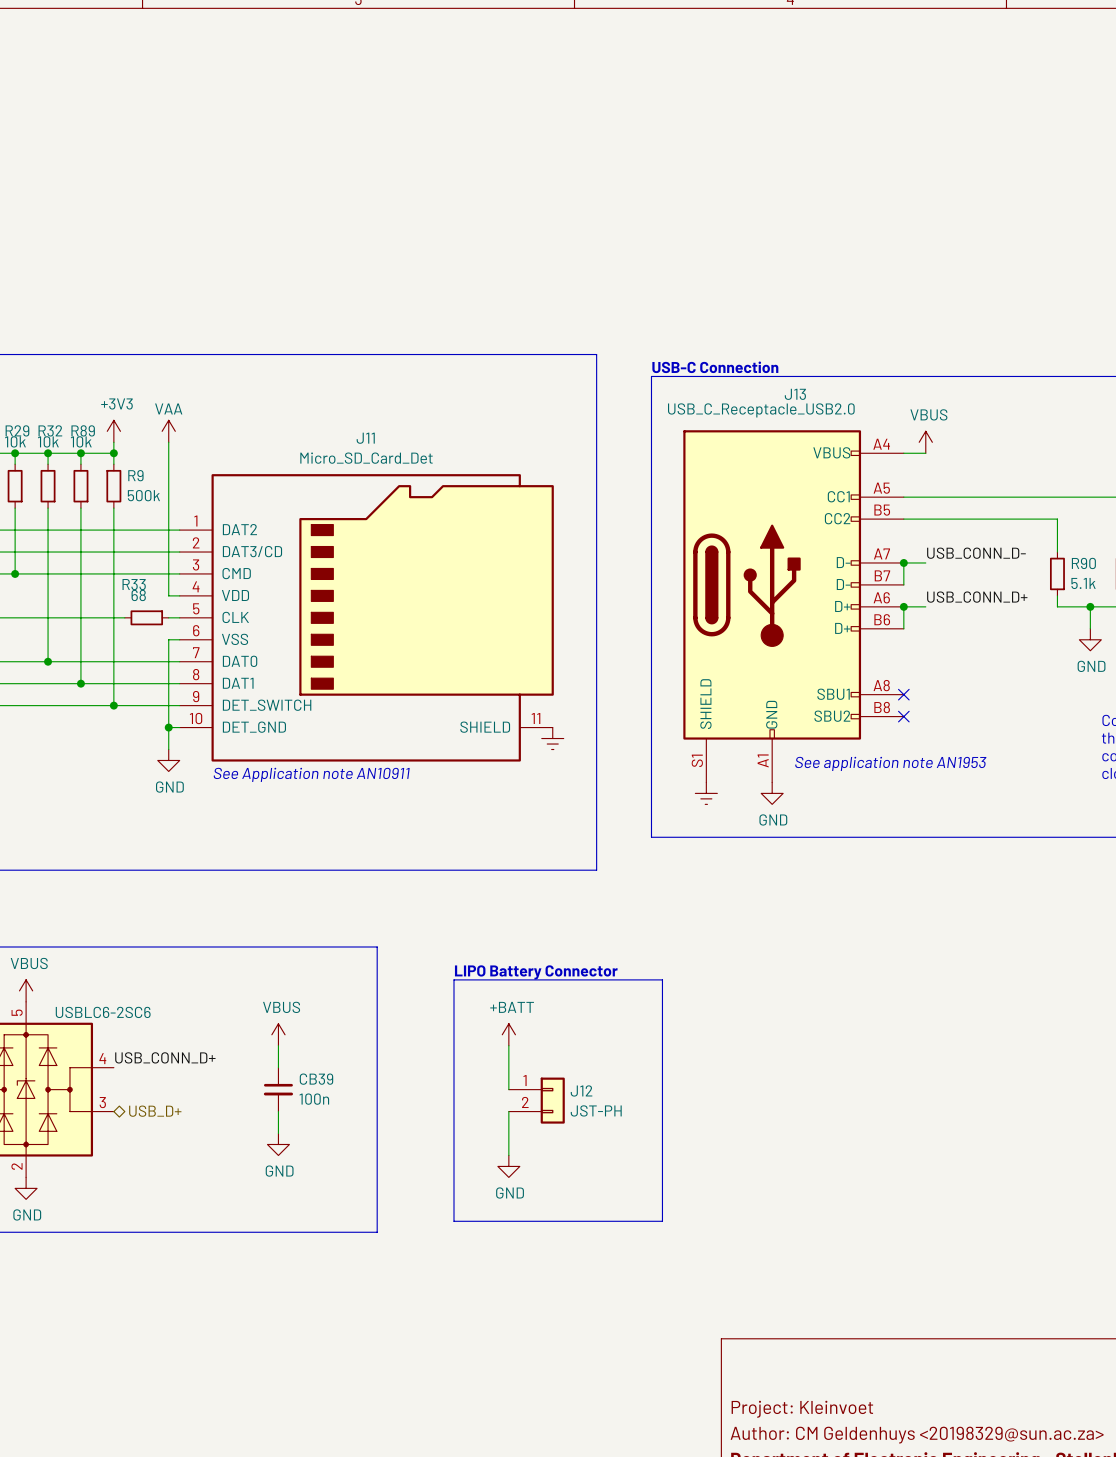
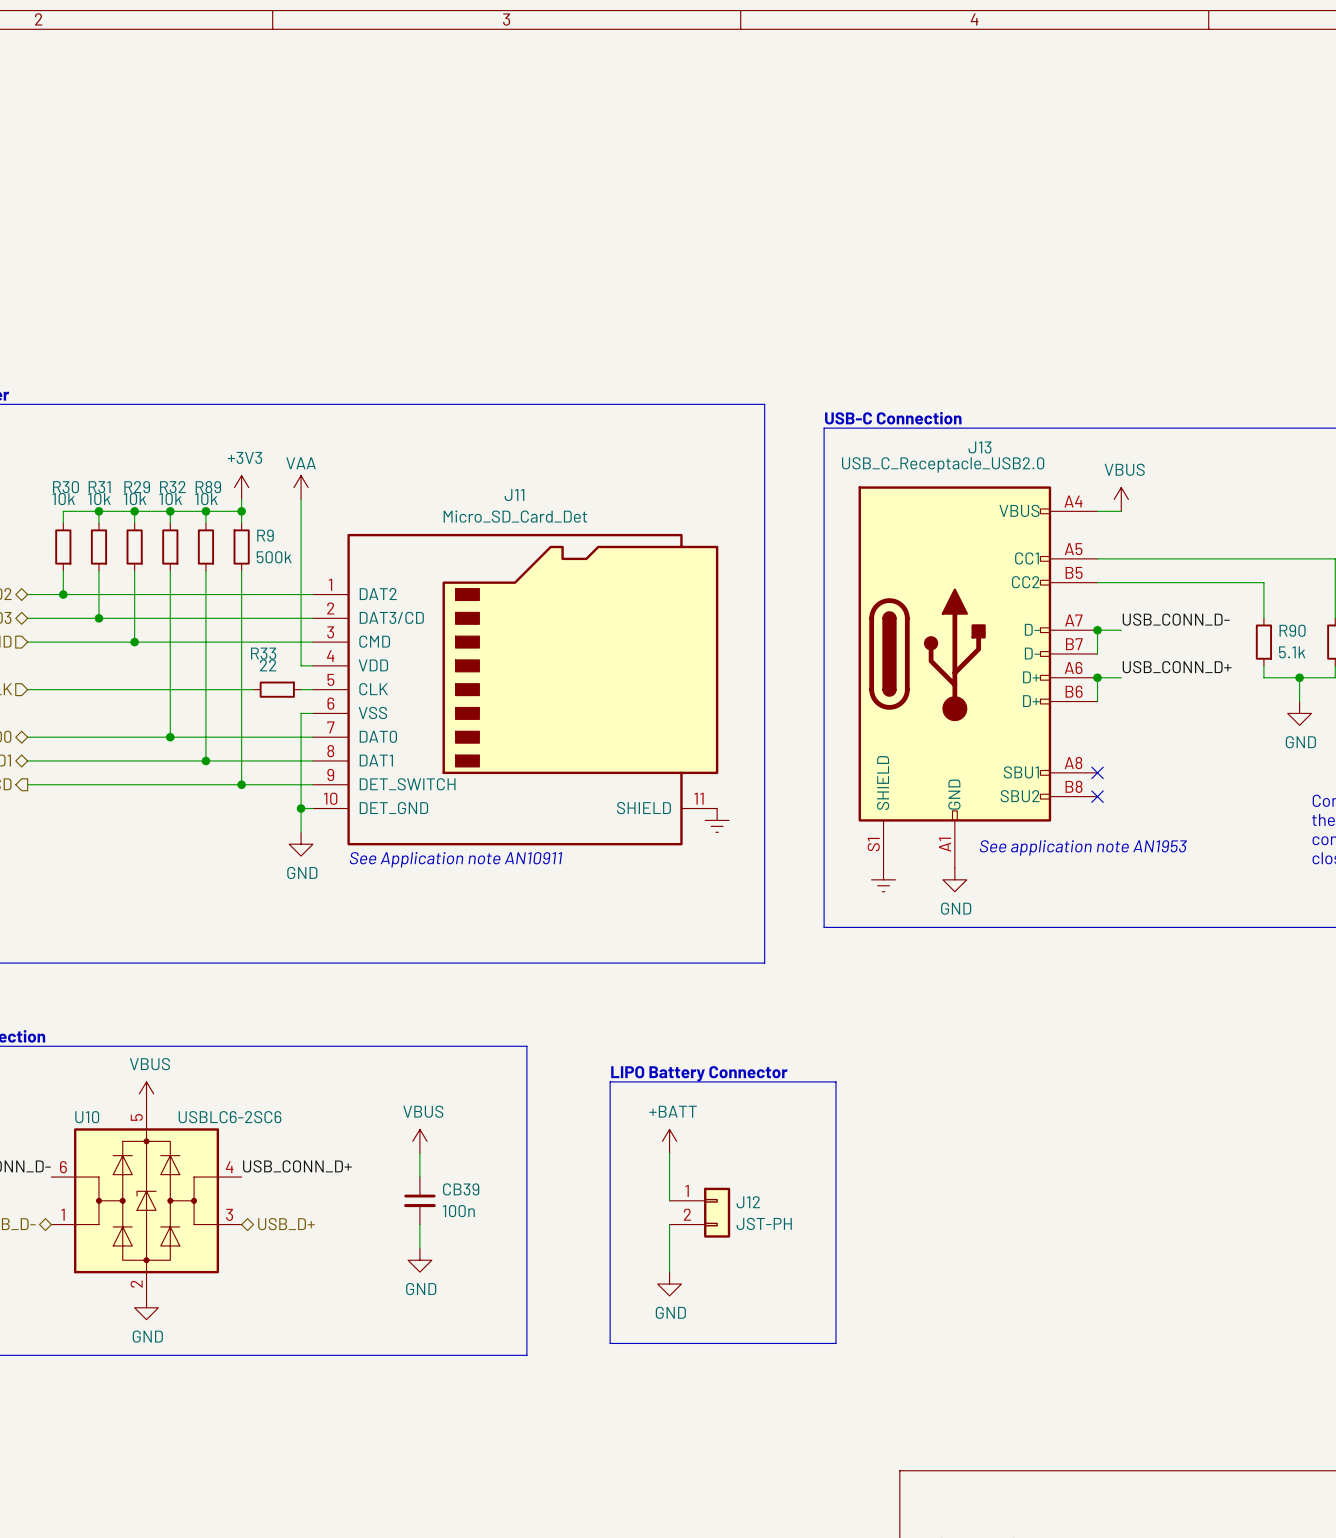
R33 value: 68 (138, 595) -> 22 (268, 665)

